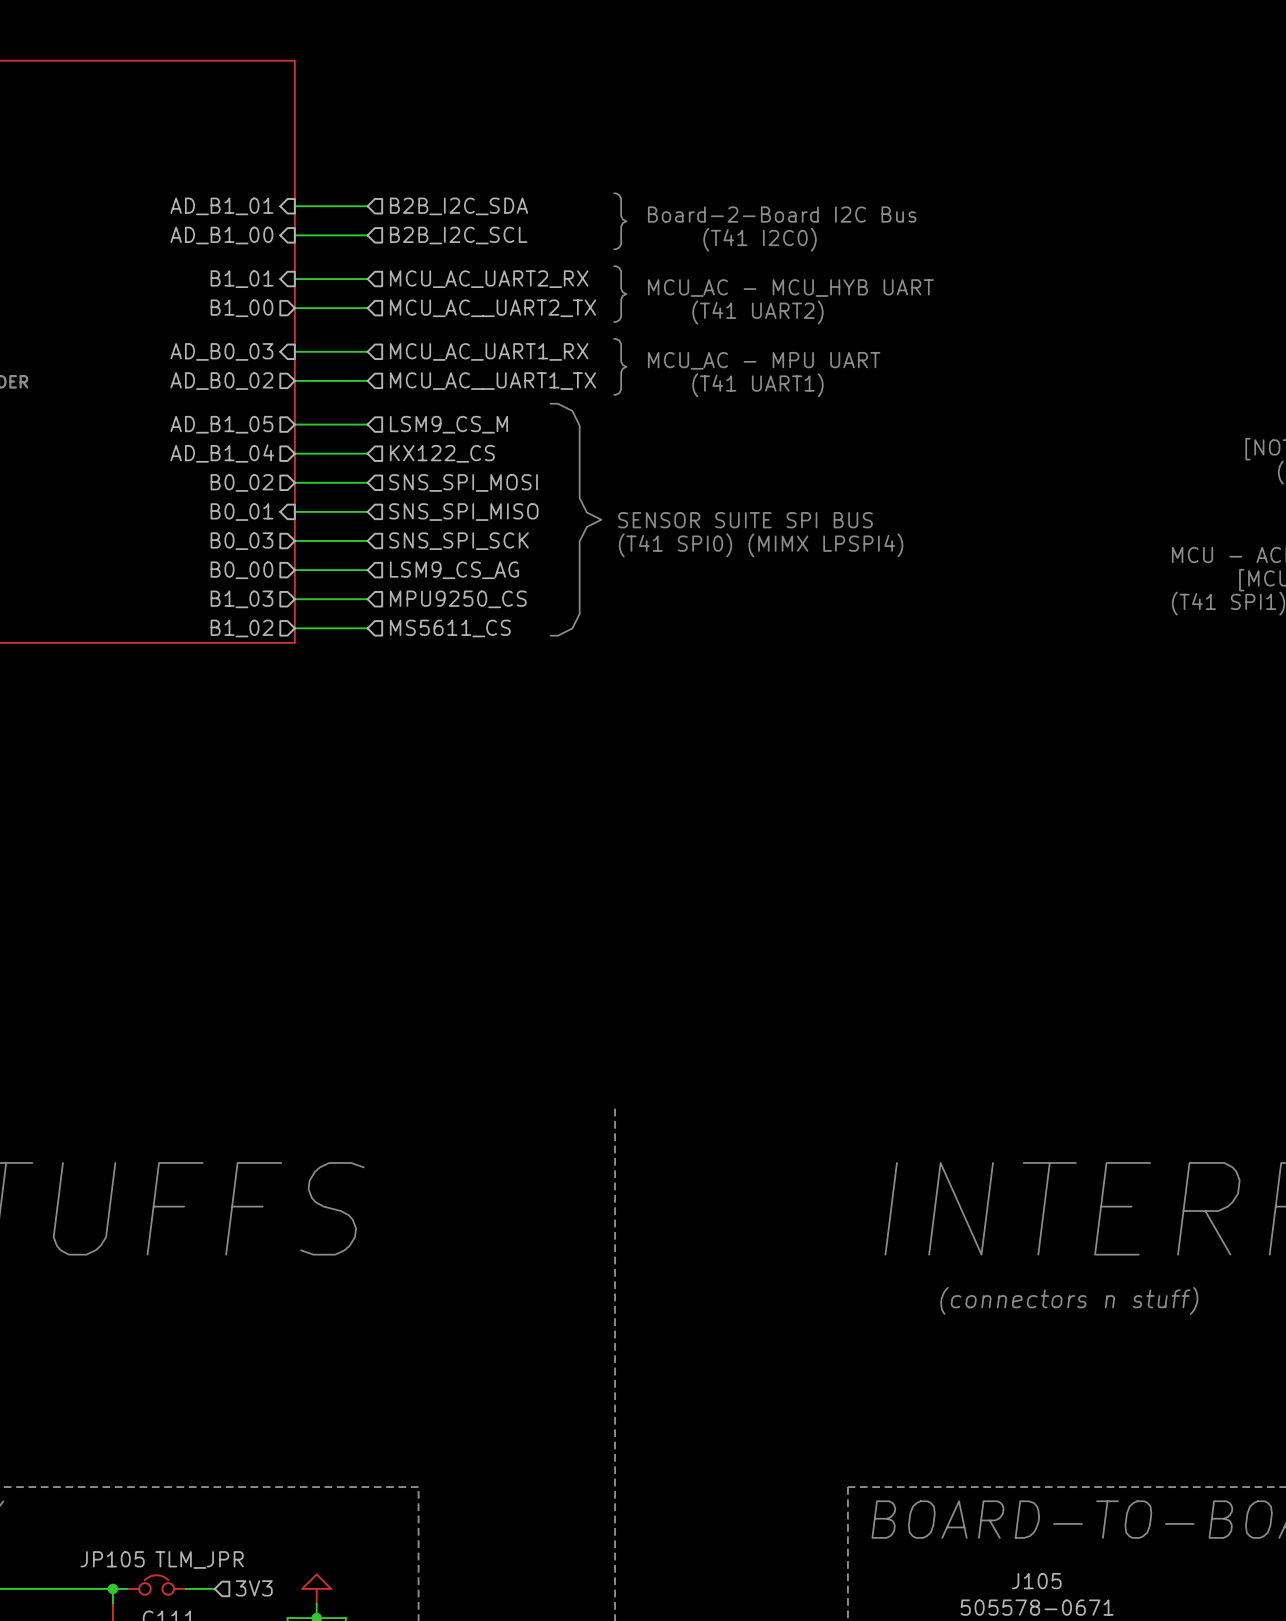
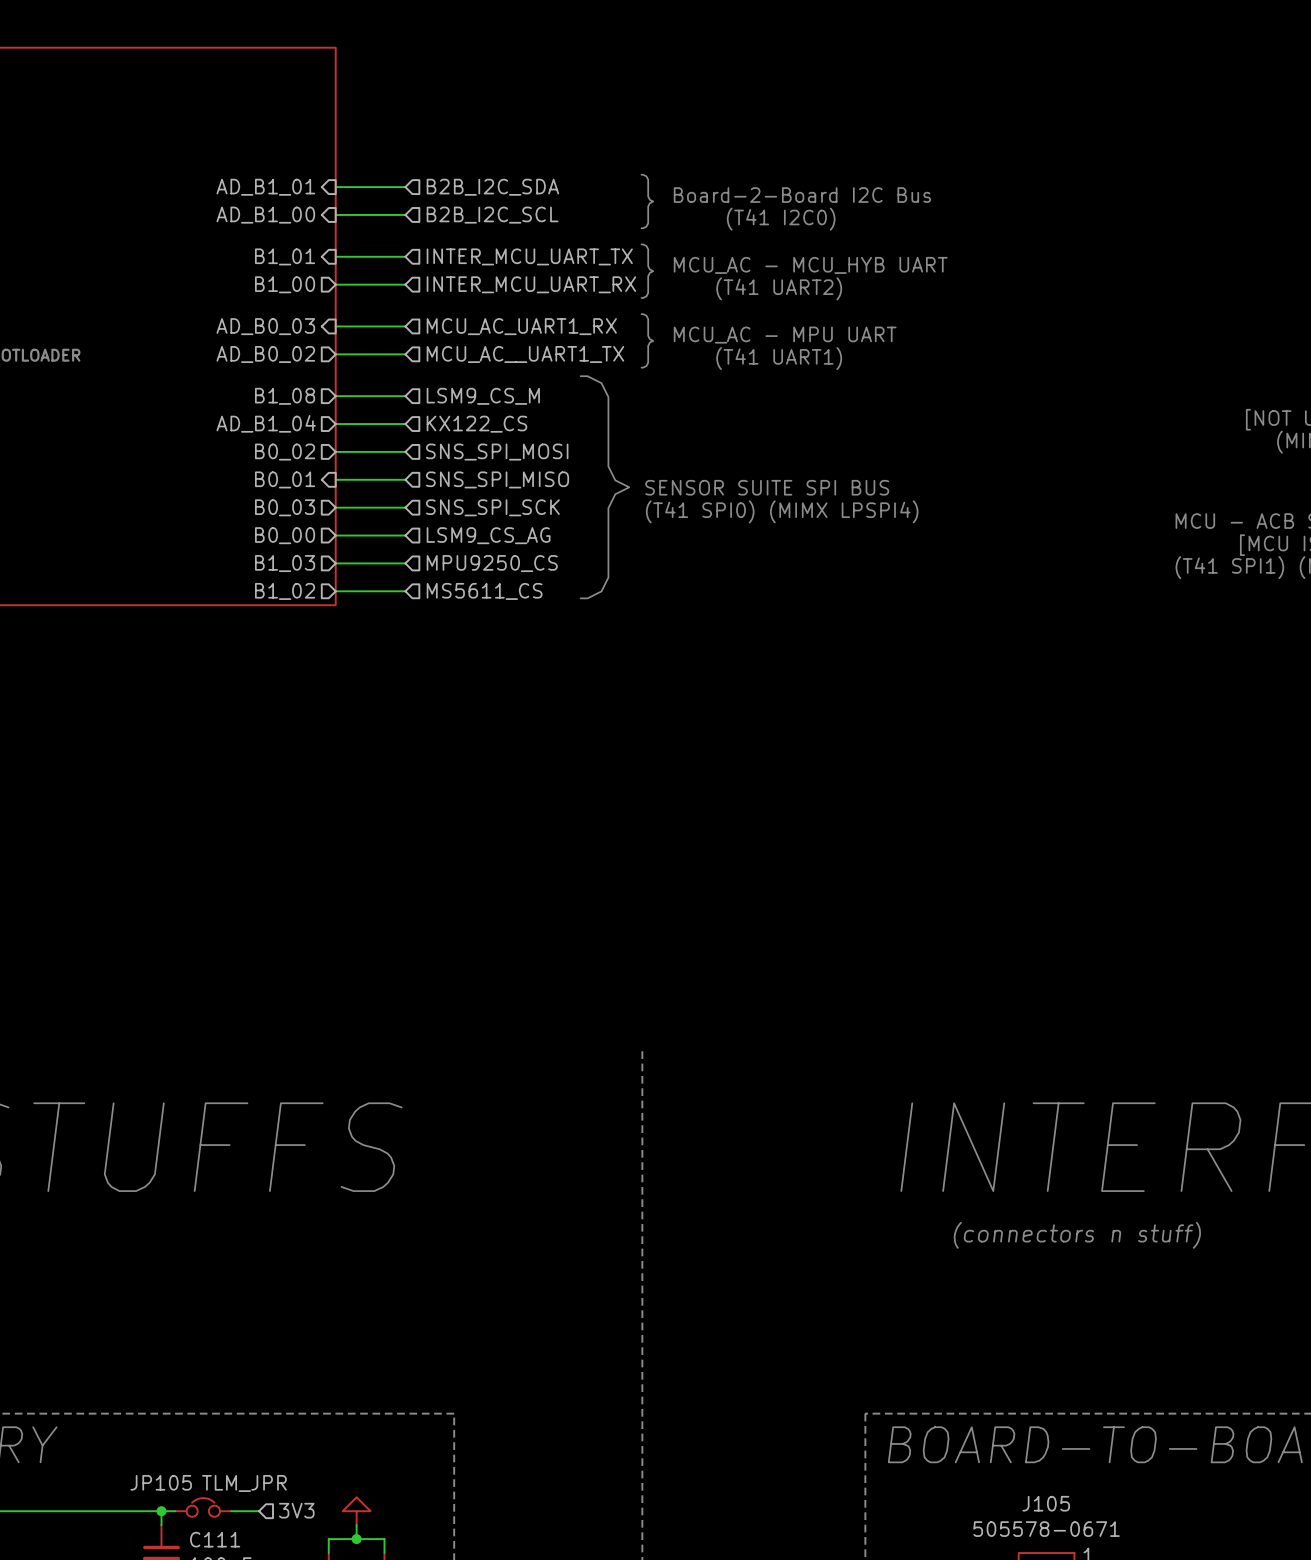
hierarchical label: MCU_AC_UART2_RX (489, 279) -> INTER_MCU_UART_TX (529, 256)
hierarchical label: MCU_AC__UART2_TX (492, 308) -> INTER_MCU_UART_RX (531, 284)
sheet pin: AD_B1_05 (221, 424) -> B1_08 (285, 396)

